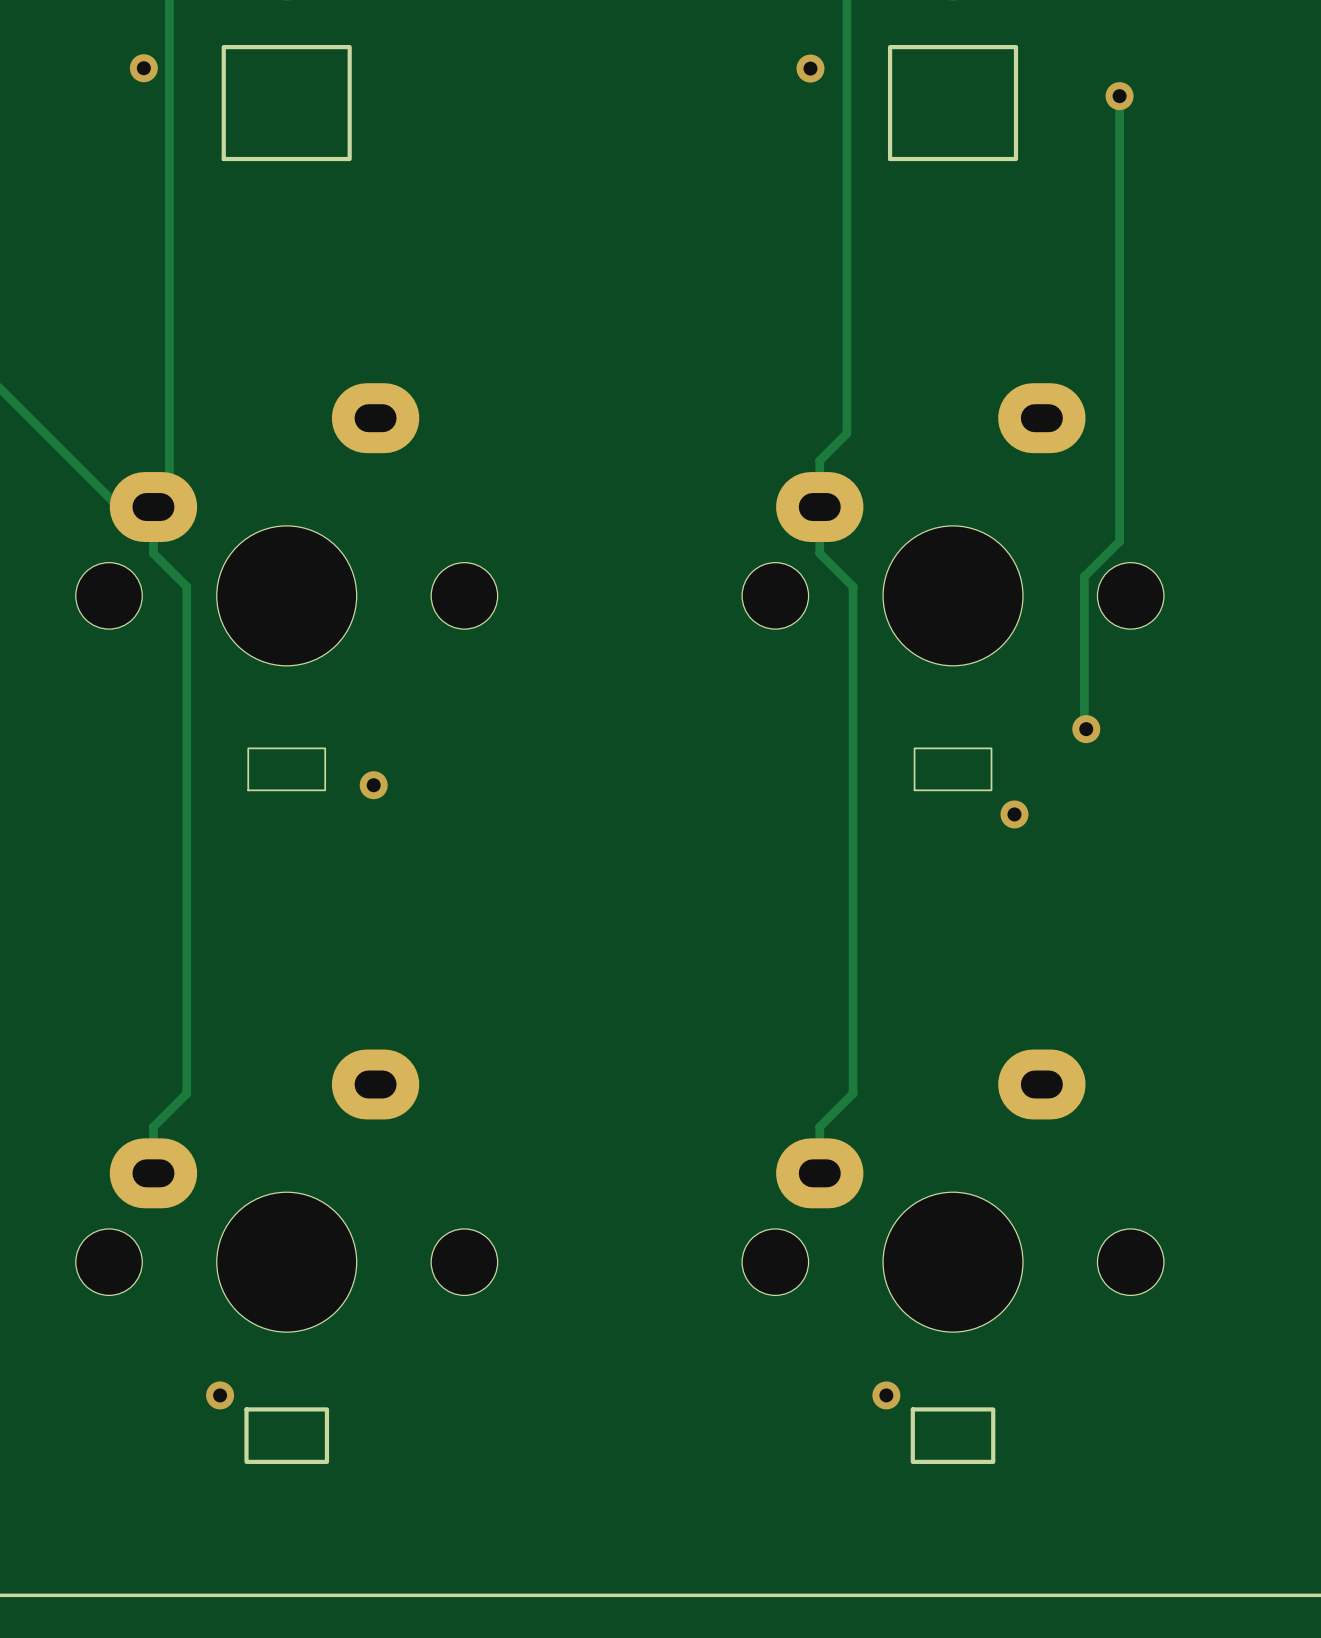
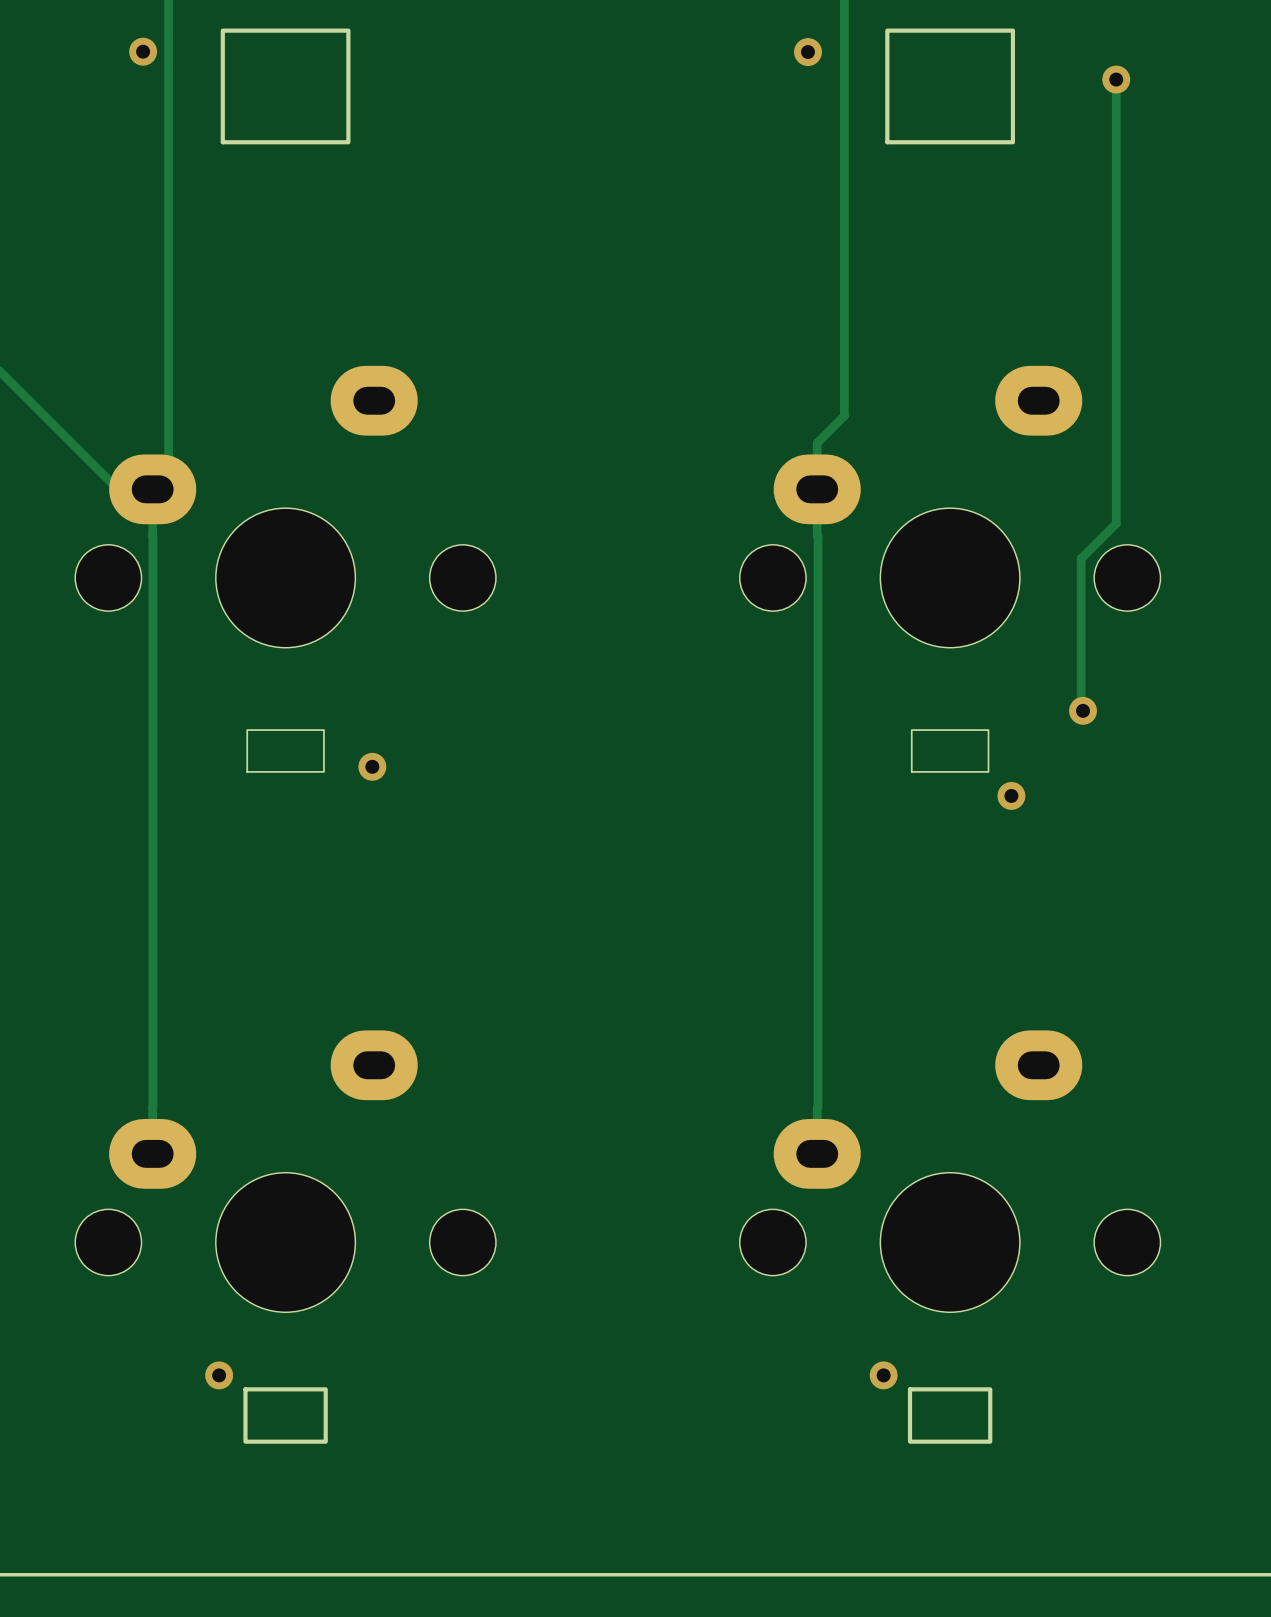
track: (153, 553) (186, 586) (186, 1093) (153, 1126) -> (152, 535) (152, 1107)
track: (820, 554) (853, 586) (853, 1093) (820, 1126) -> (818, 536) (818, 1106)

